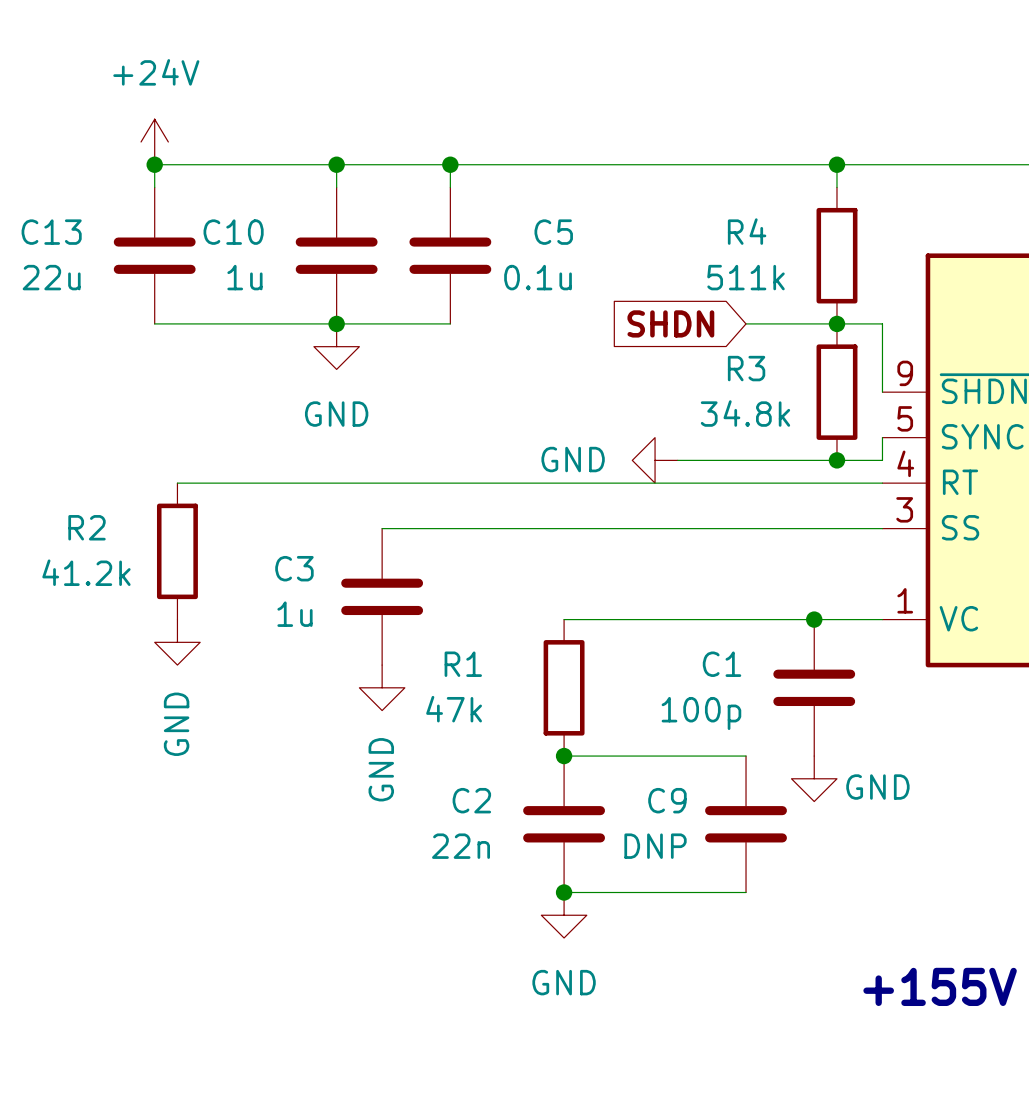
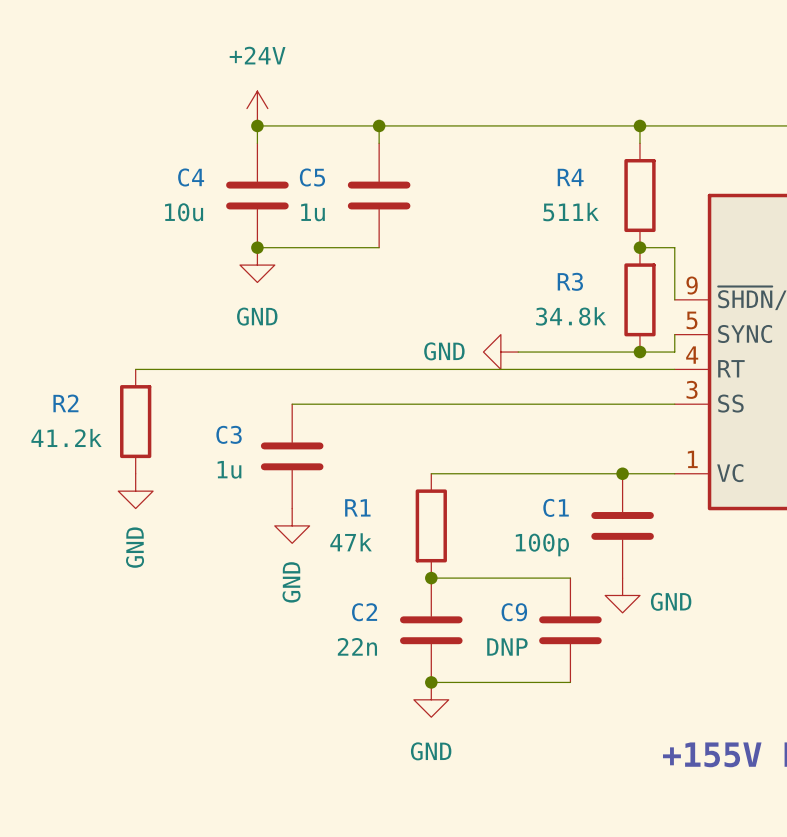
power symbol position: +24V (154, 141) -> +24V (257, 108)
junction: (154, 164) -> none
wire: (336, 164) (154, 164) (154, 187) -> none
wire: (450, 164) (450, 187) -> (379, 125) (379, 143)
junction position: (450, 164) -> (379, 125)
C10 name: C10 (233, 232) -> C4 (191, 177)
C5 name position: C5 (553, 232) -> C5 (312, 177)
C13: 22u (154, 255) -> none
C5 position: (450, 255) -> (379, 195)
C10 value: 1u (244, 277) -> 10u (184, 212)
C5 value: 0.1u (538, 277) -> 1u (312, 212)
wire: (154, 323) (336, 323) -> none
wire: none -> (344, 247) (379, 247)
global label: SHDN (670, 323) -> none
wire: (746, 323) (836, 323) -> none

